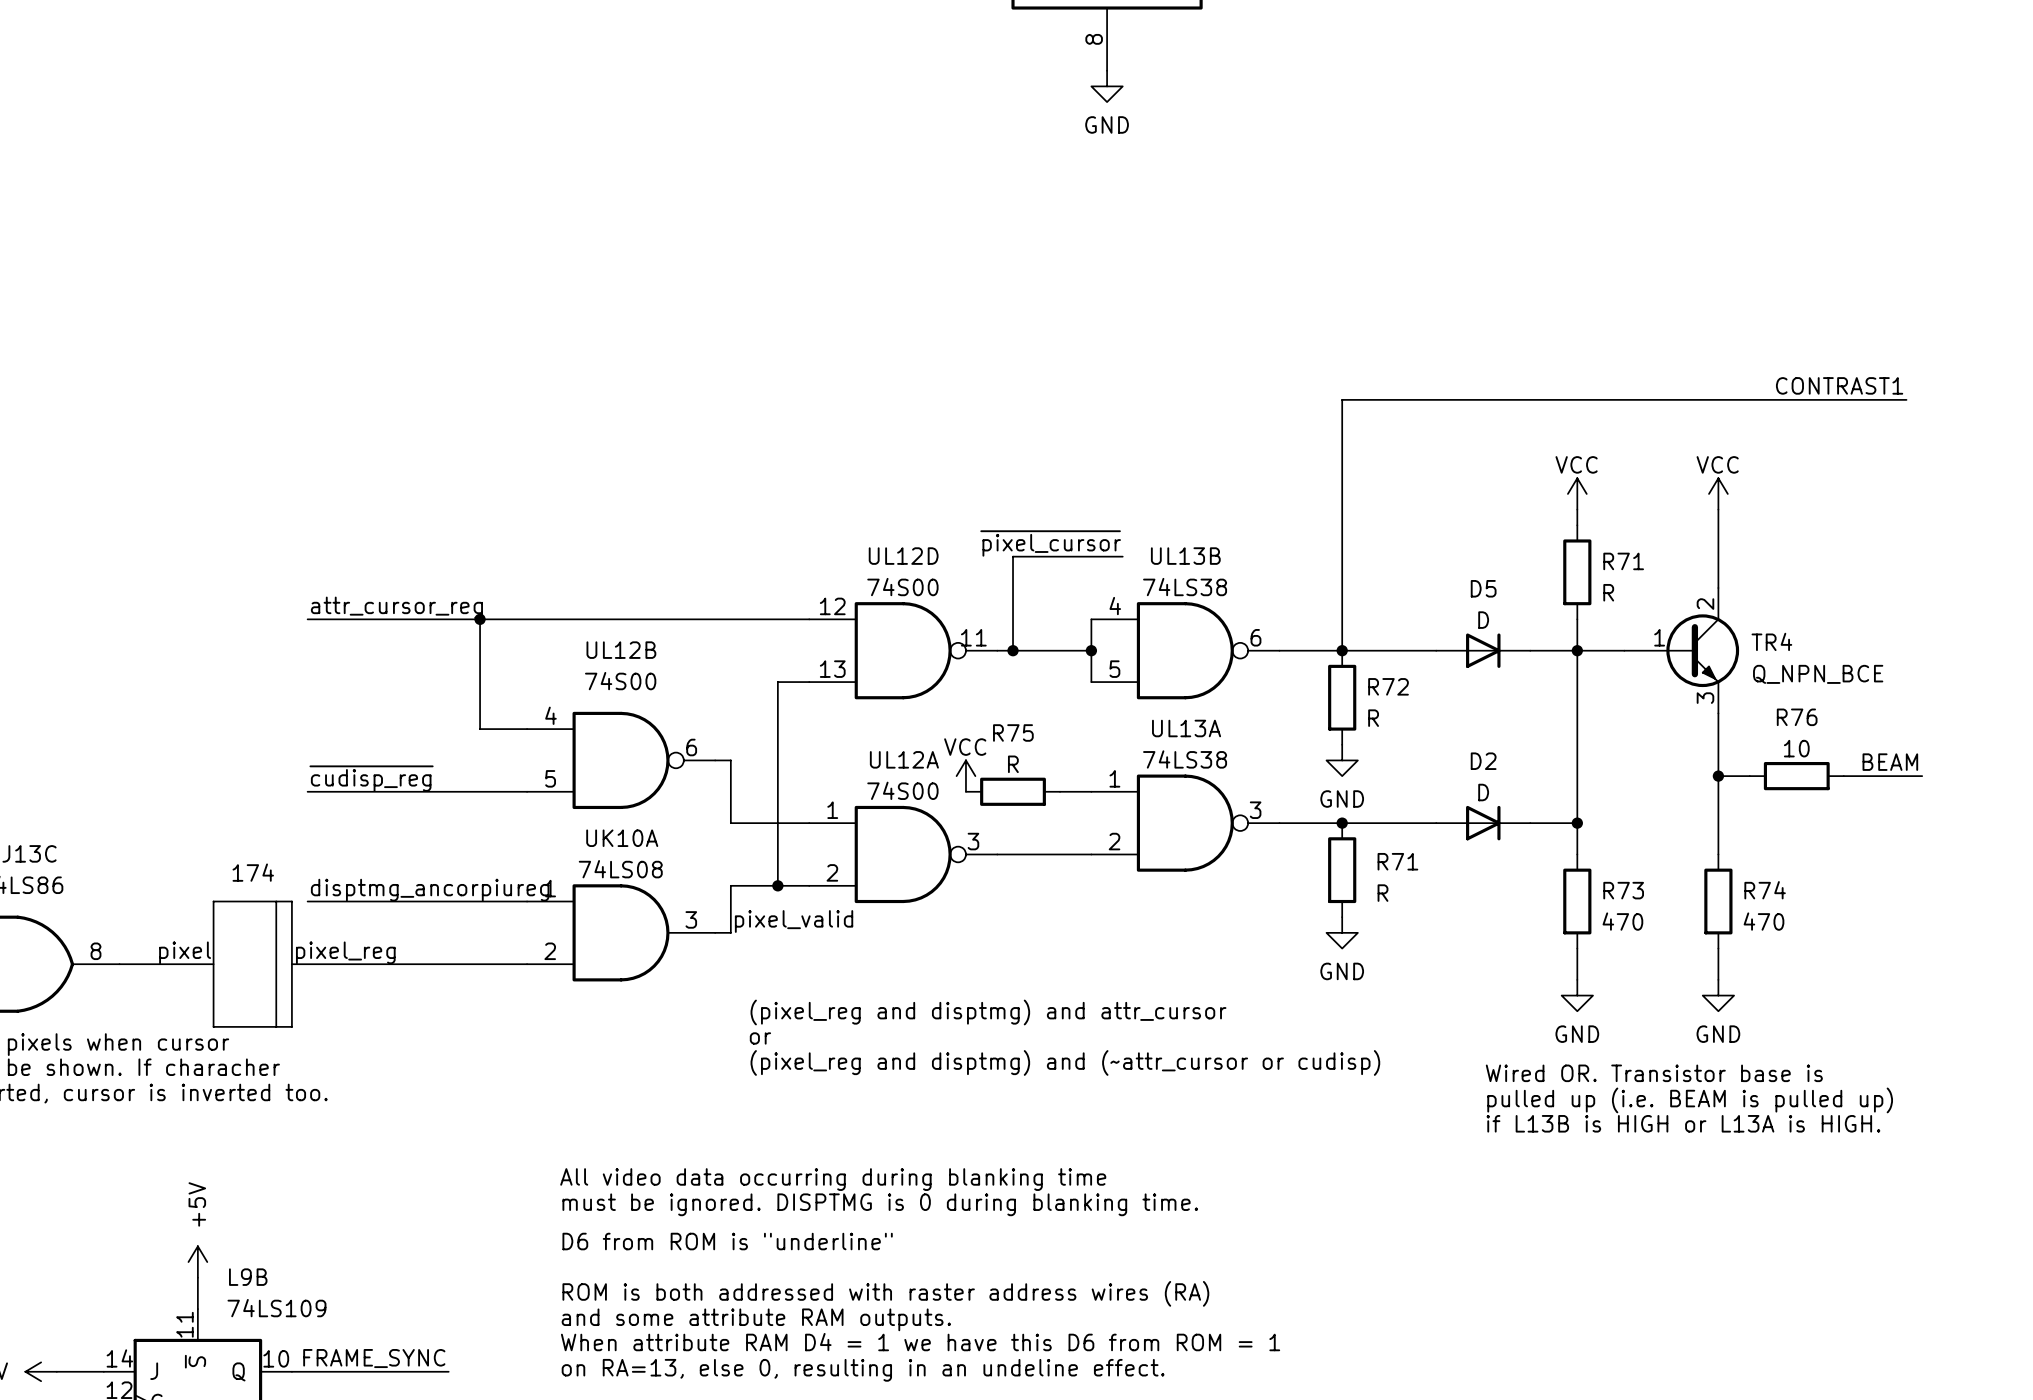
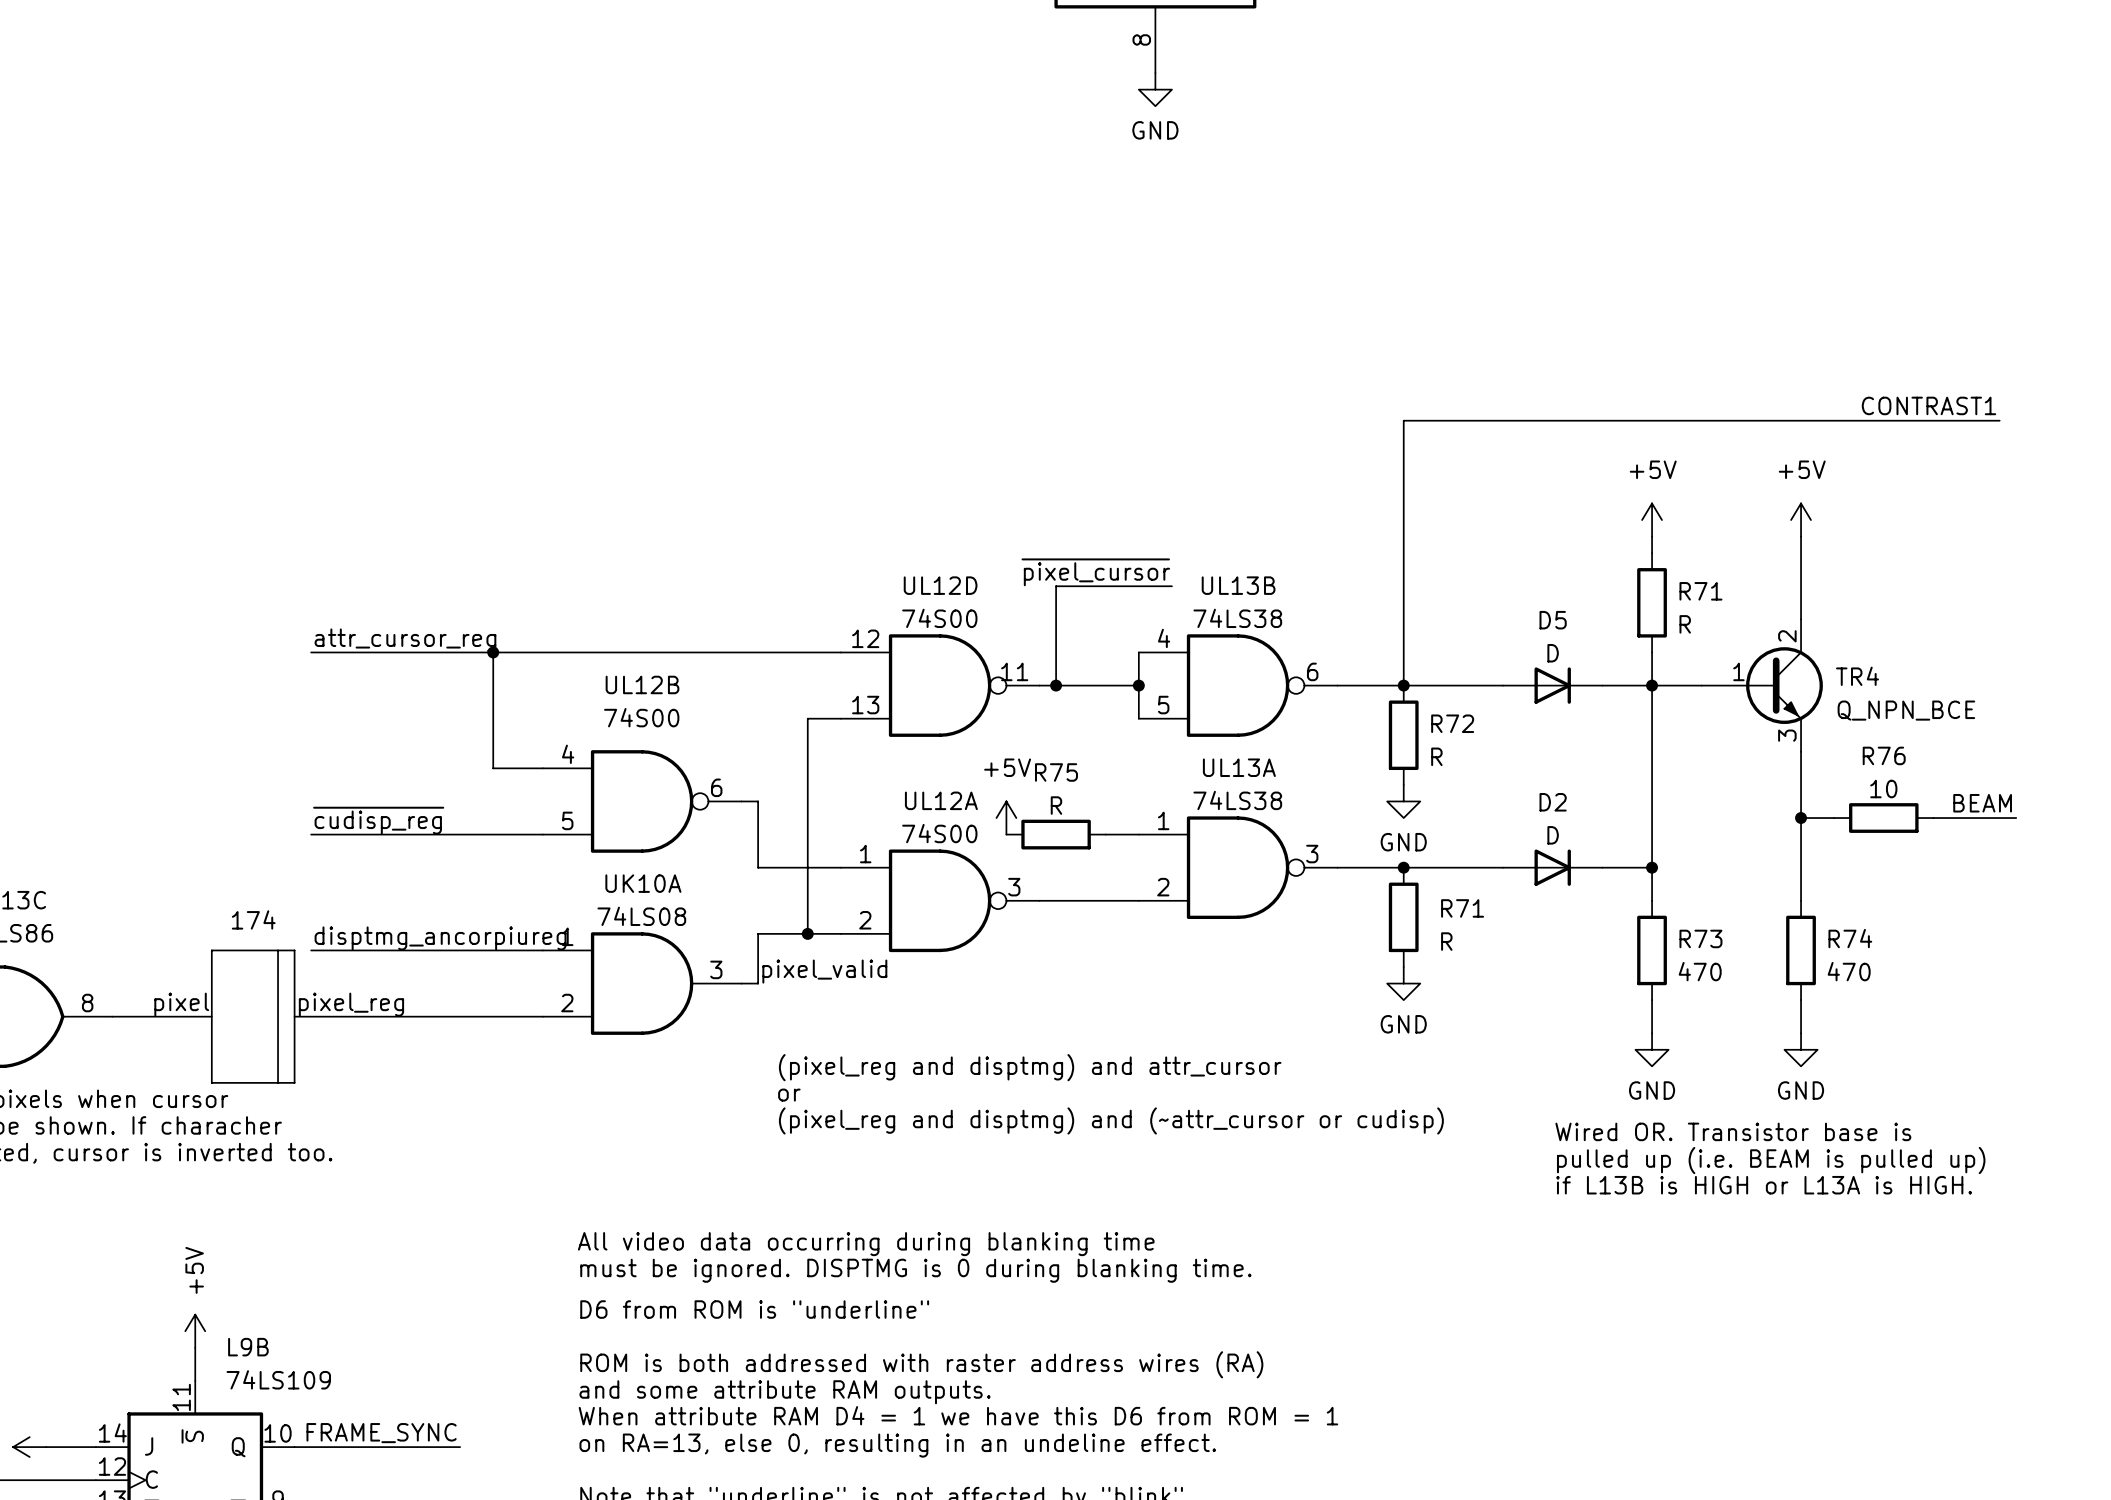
power symbol: VCC (1577, 493) -> +5V (1652, 520)
power symbol: VCC (1718, 493) -> +5V (1801, 520)
power symbol: VCC (965, 776) -> +5V (1006, 818)

